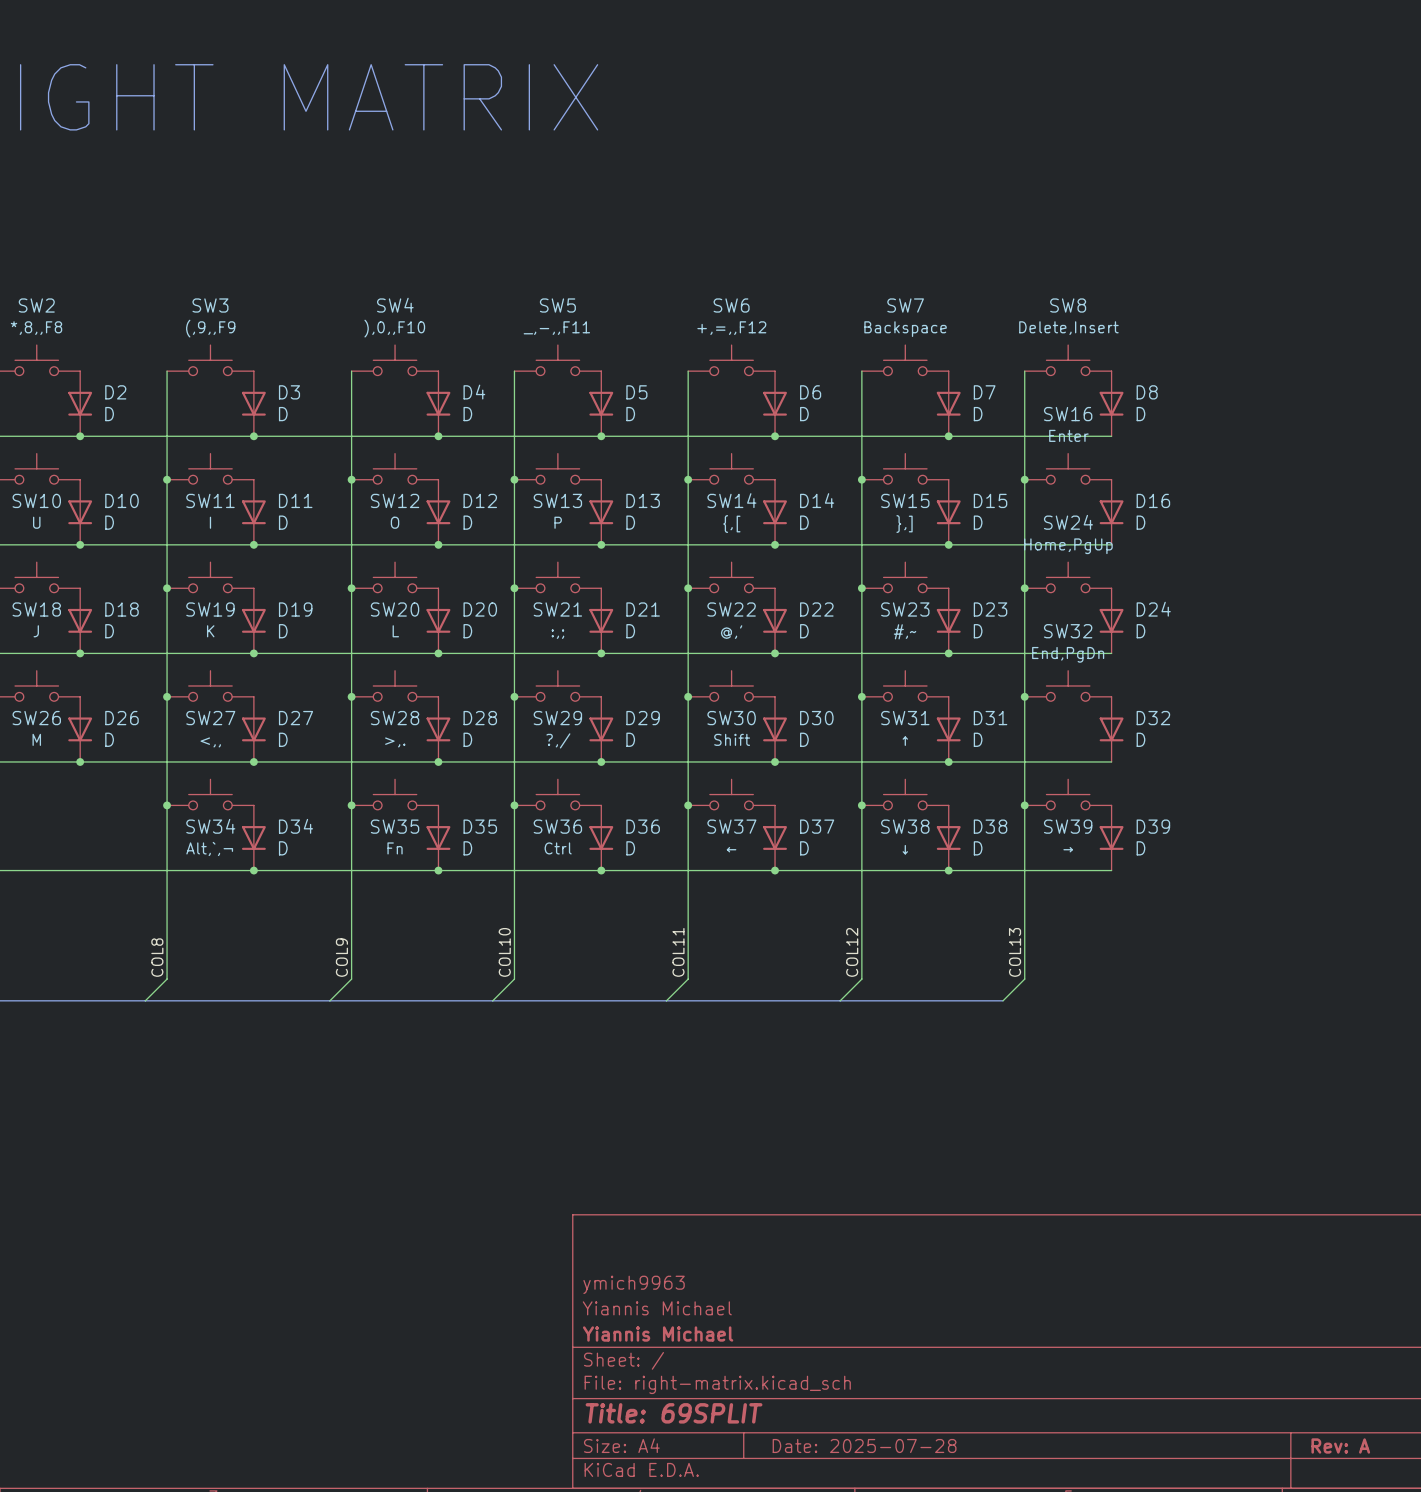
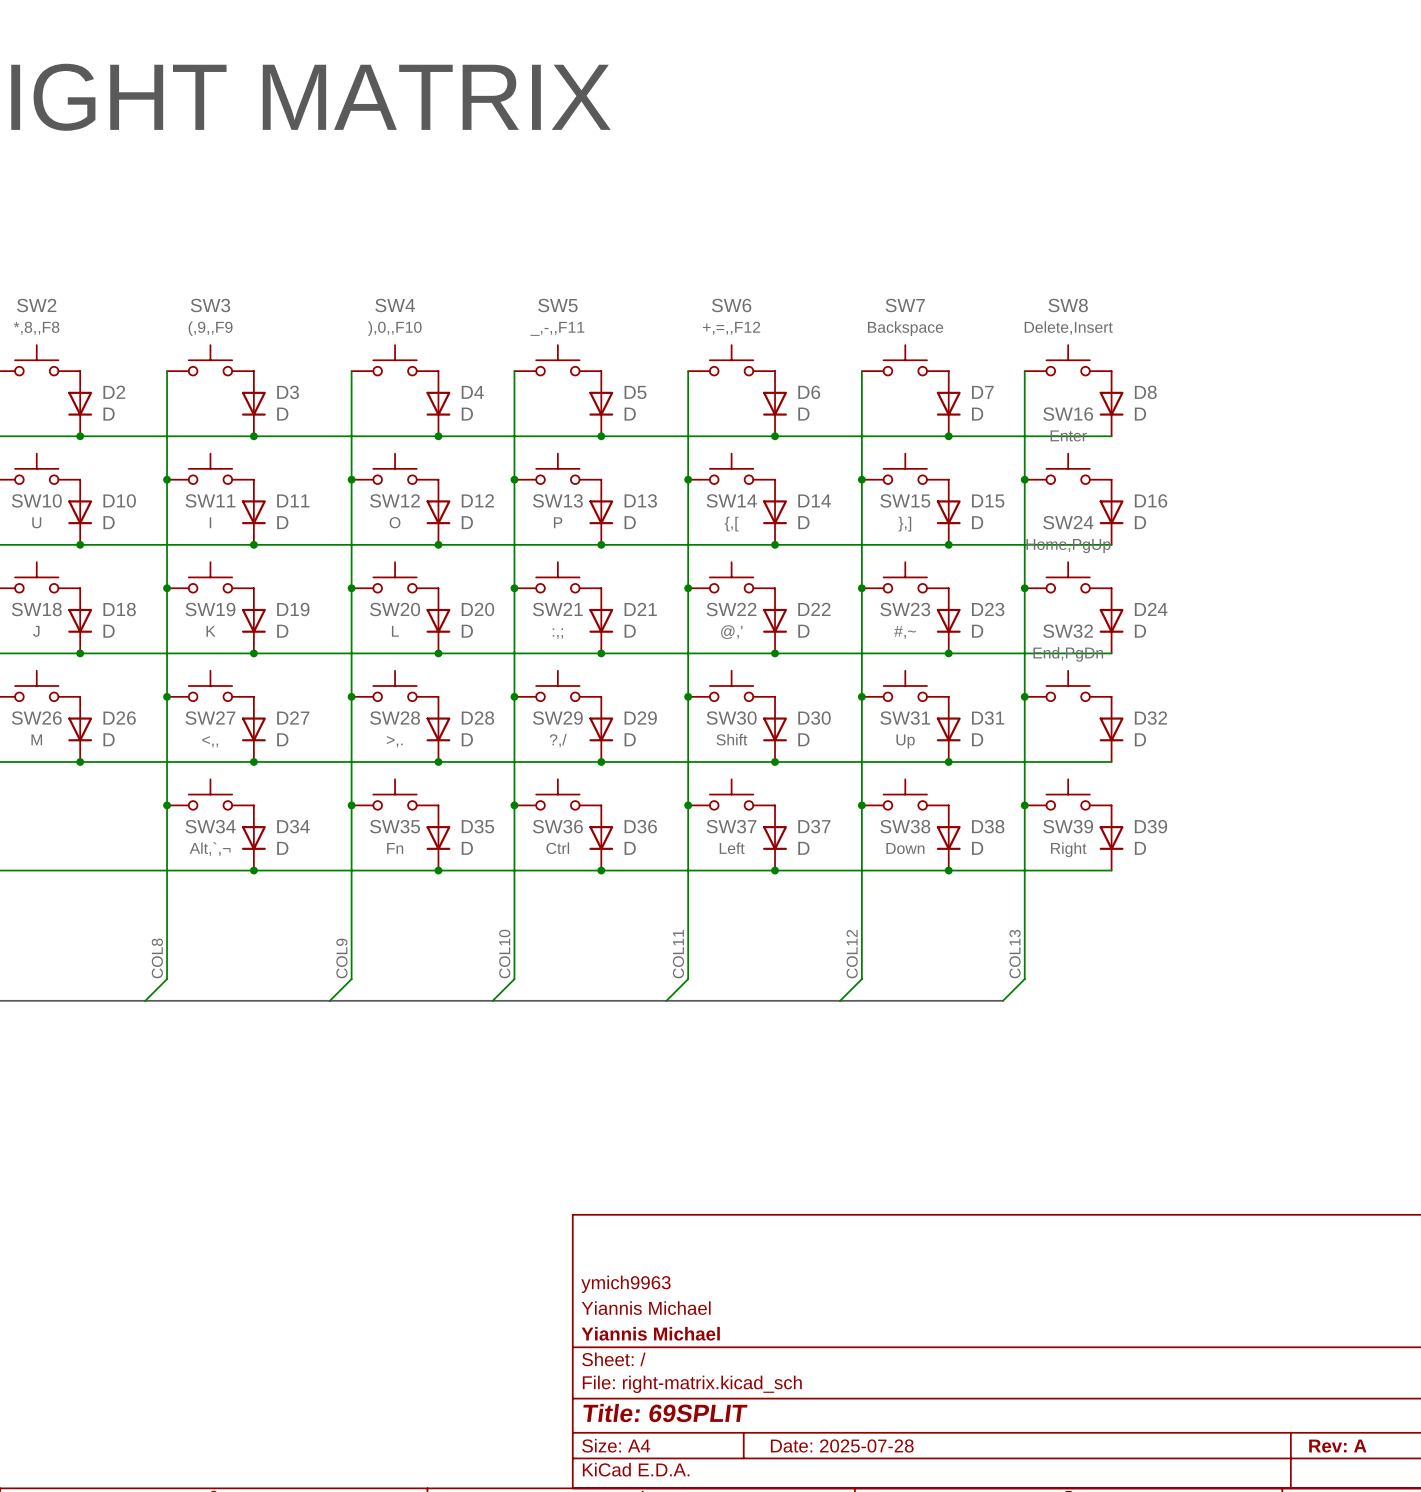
SW31 text: ↑ (905, 741) -> Up (905, 741)
SW37 text: ← (731, 849) -> Left (732, 848)
SW38 text: ↓ (905, 849) -> Down (905, 848)
SW39 text: → (1068, 849) -> Right (1068, 849)

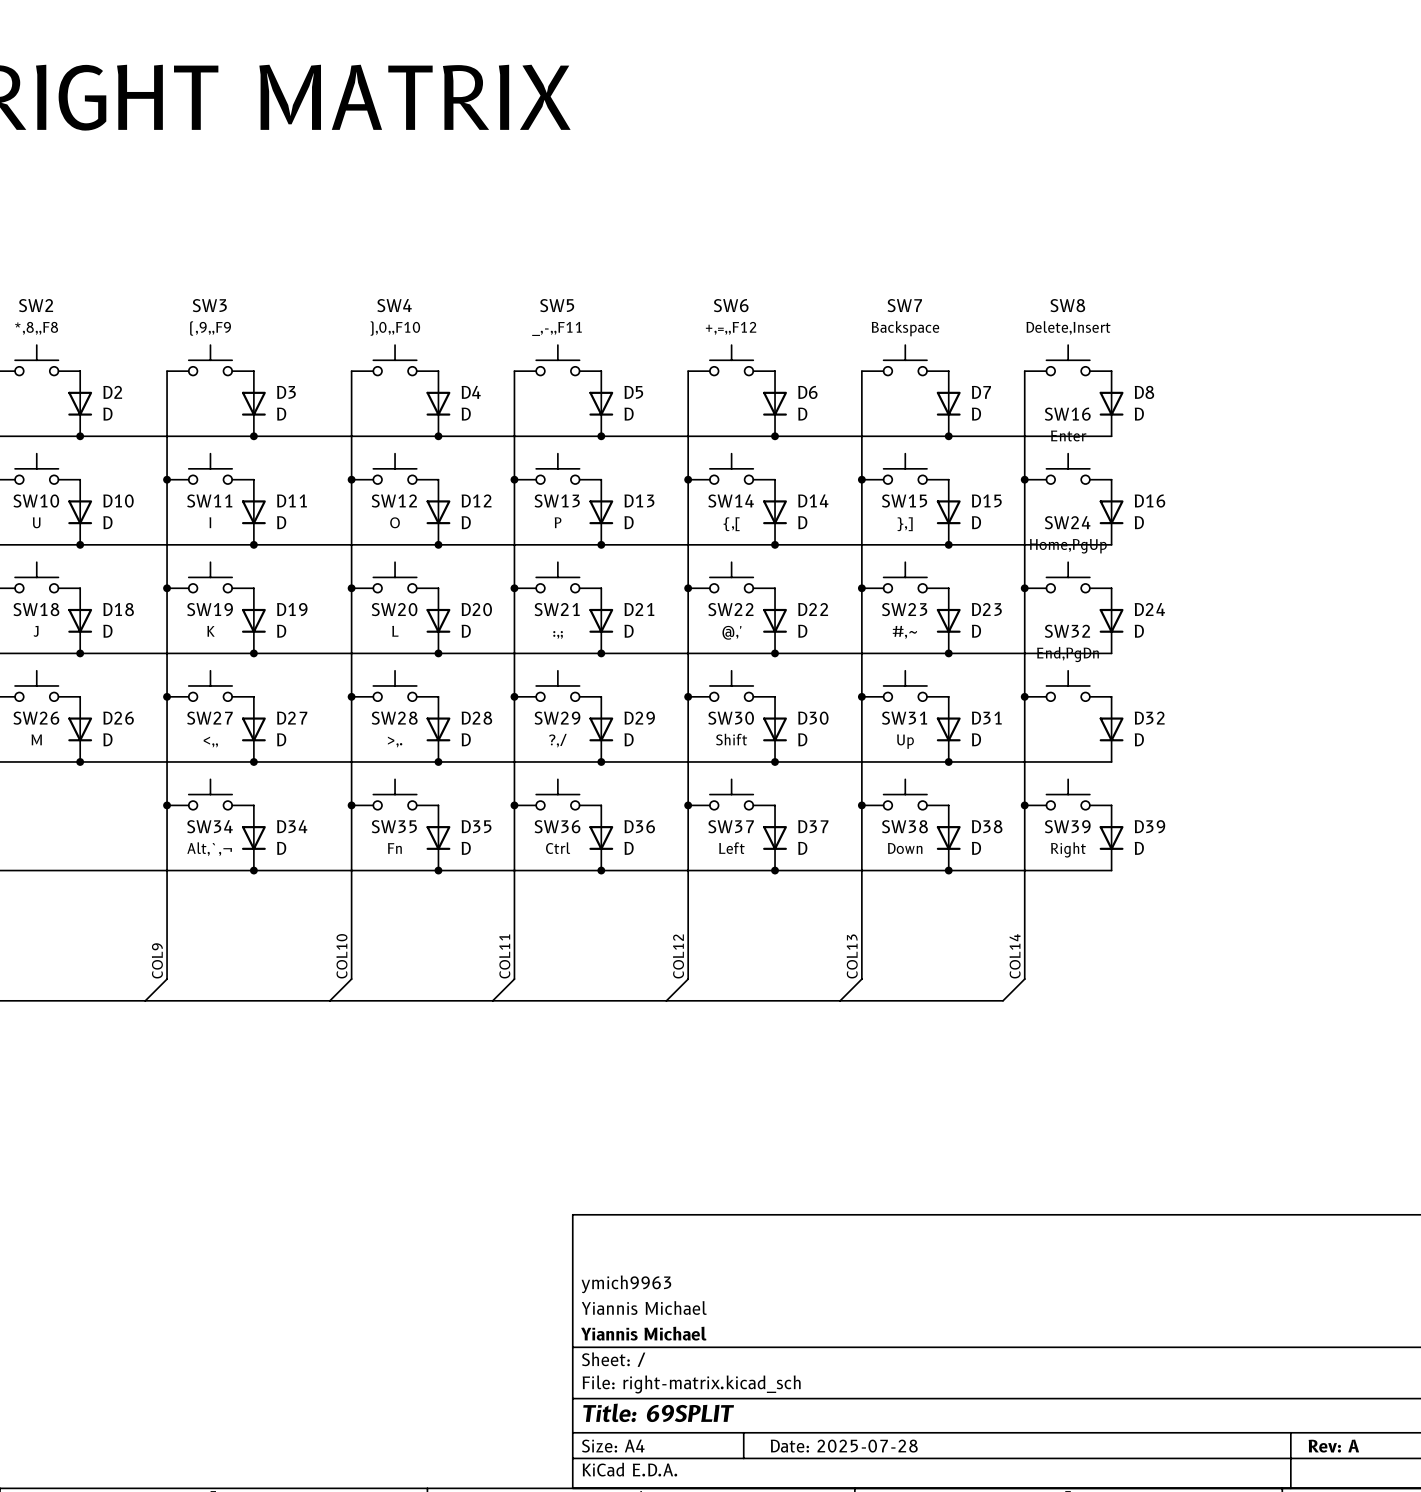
label: COL10 (504, 954) -> COL11 (504, 956)
label: COL11 (678, 954) -> COL12 (678, 956)
label: COL12 (852, 954) -> COL13 (852, 956)
label: COL13 (1015, 954) -> COL14 (1015, 956)
label: COL8 (157, 958) -> COL9 (157, 960)
label: COL9 (341, 958) -> COL10 (341, 956)

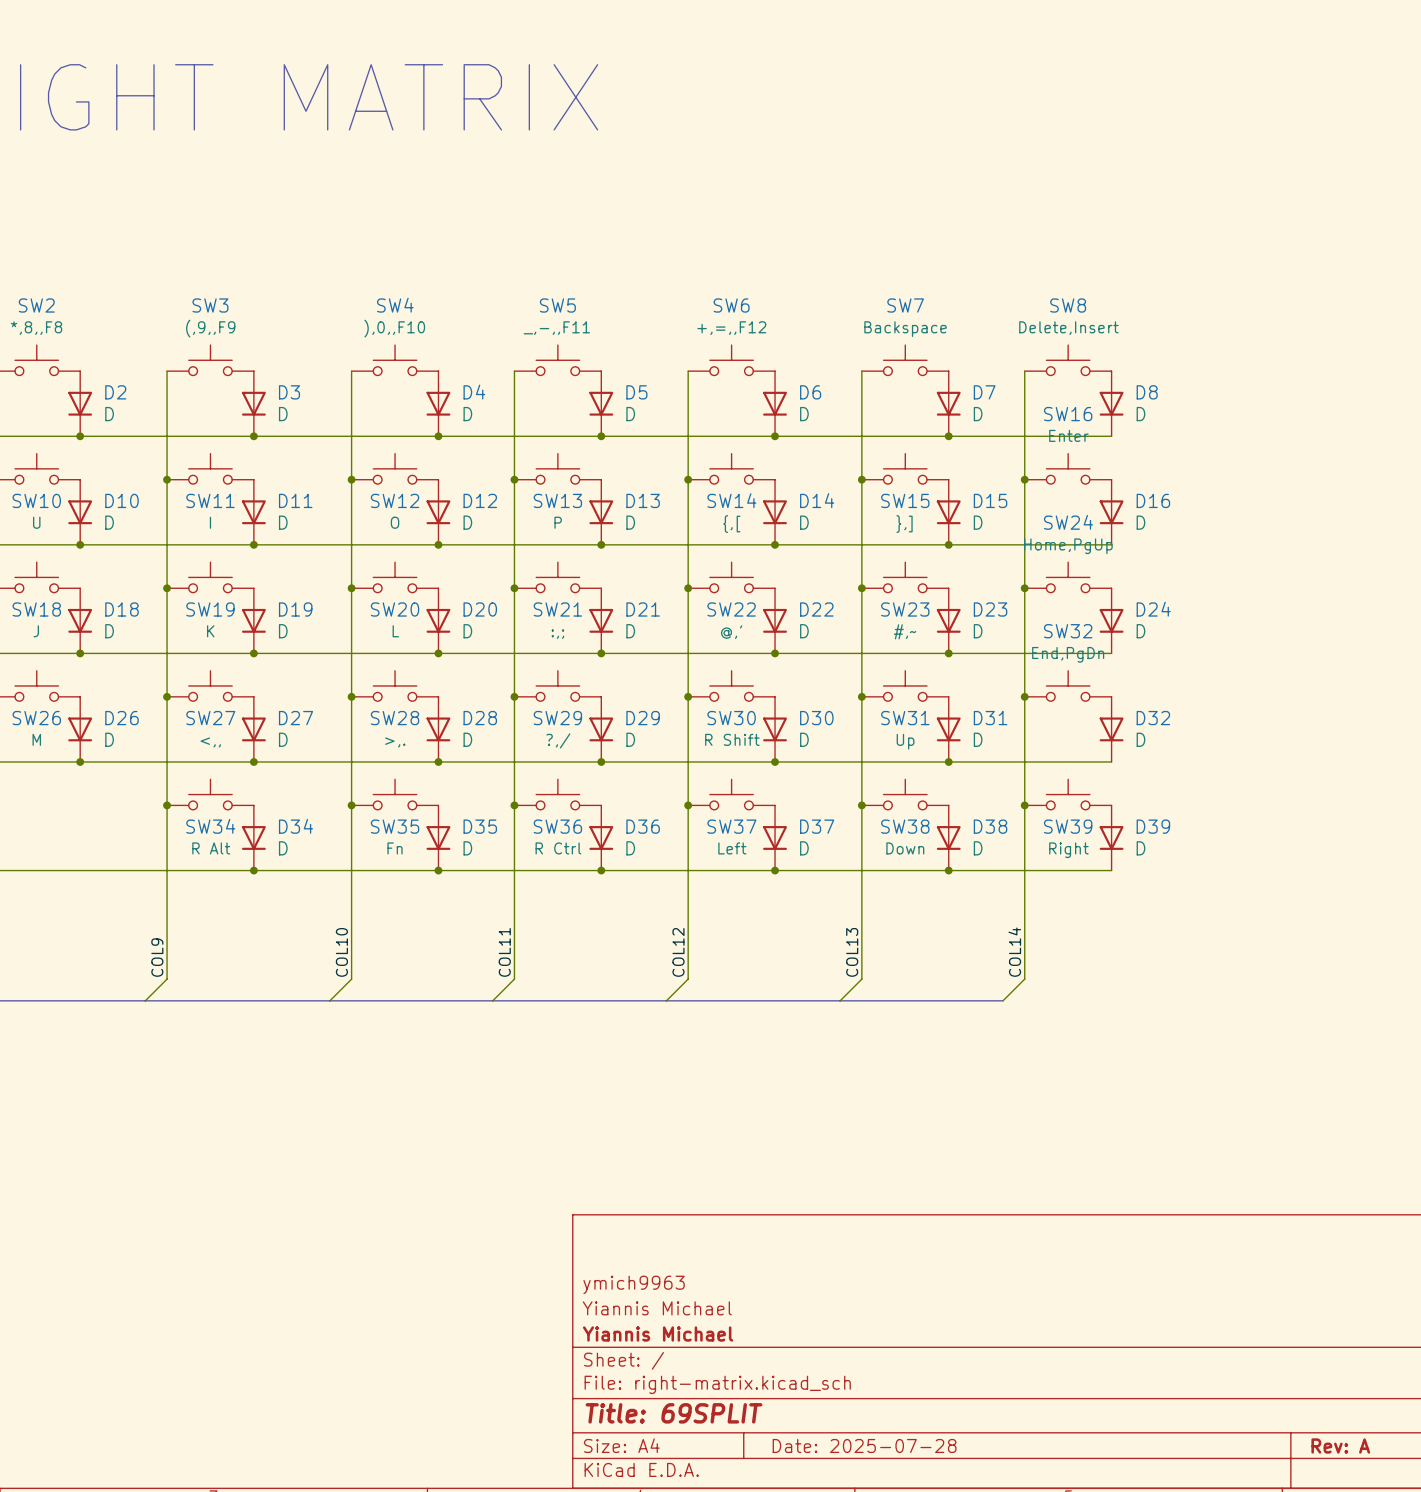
SW30 text: Shift (731, 739) -> R Shift (732, 739)
SW36 text: Ctrl (558, 848) -> R Ctrl (558, 848)
SW34 text: Alt,`,¬ (209, 849) -> R Alt (211, 848)

